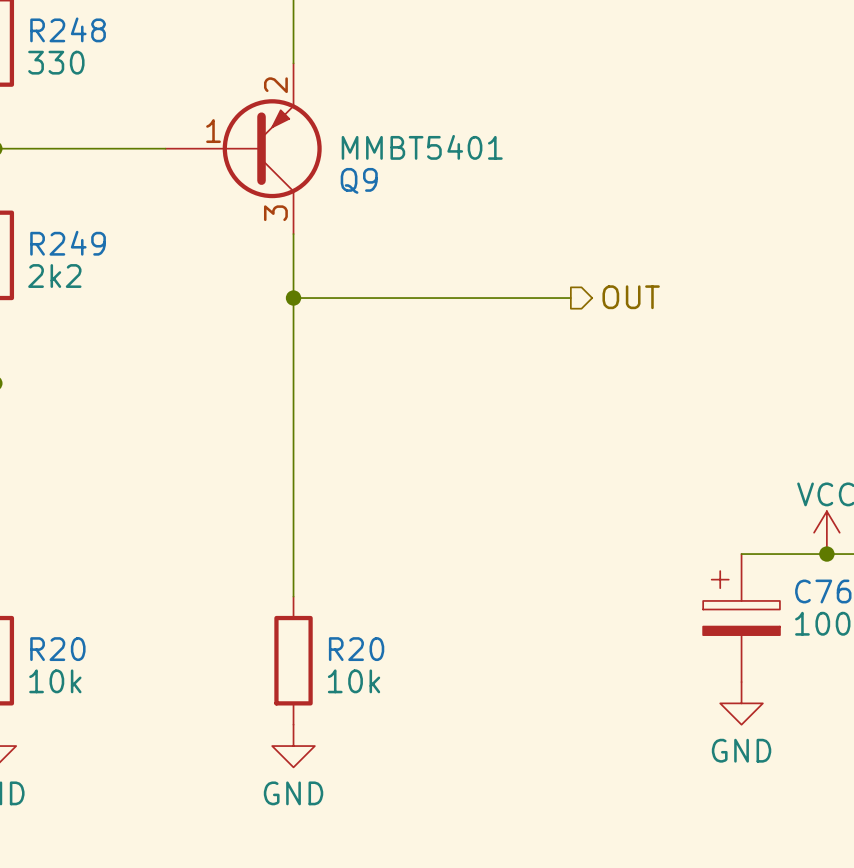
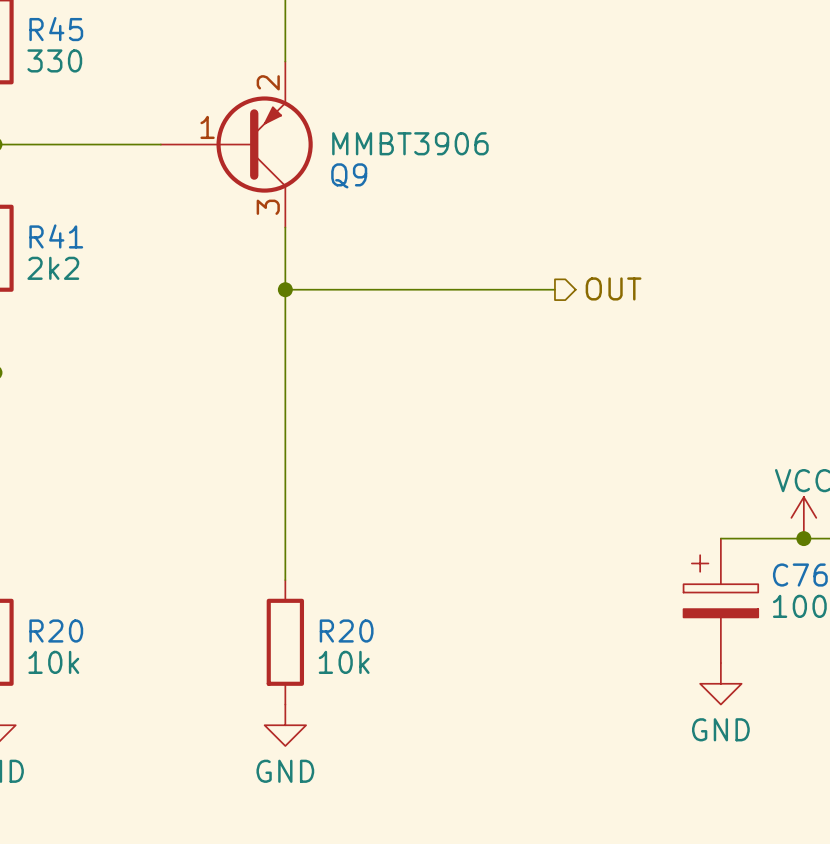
R248 name: R248 (68, 29) -> R45 (56, 29)
Q9 value: MMBT5401 (422, 147) -> MMBT3906 (410, 143)
R249 name: R249 (68, 243) -> R41 (56, 236)

